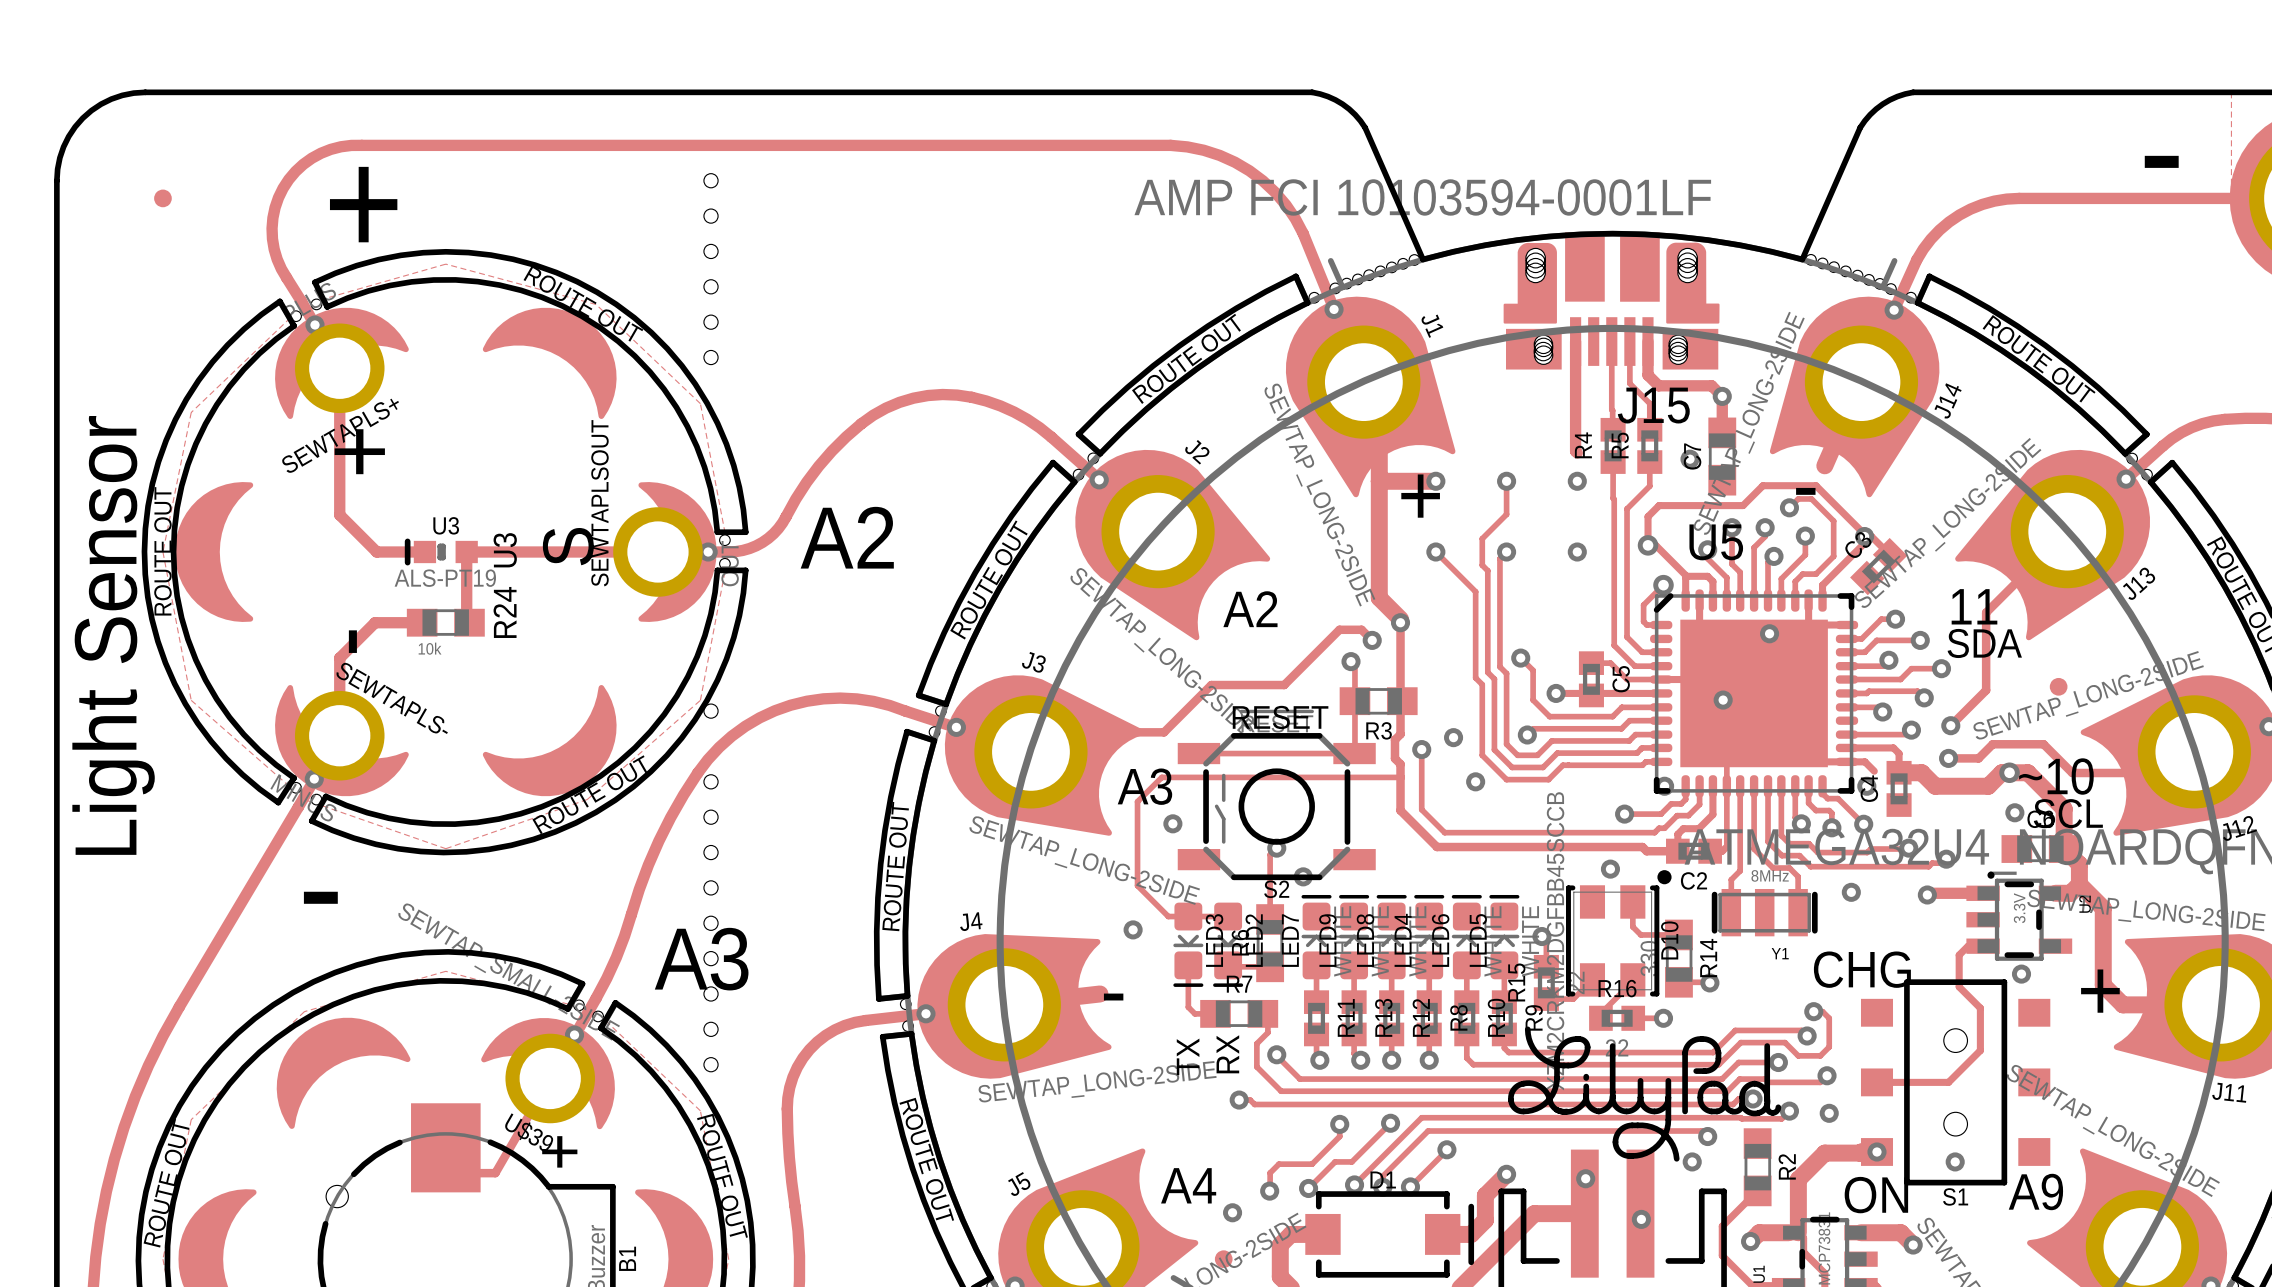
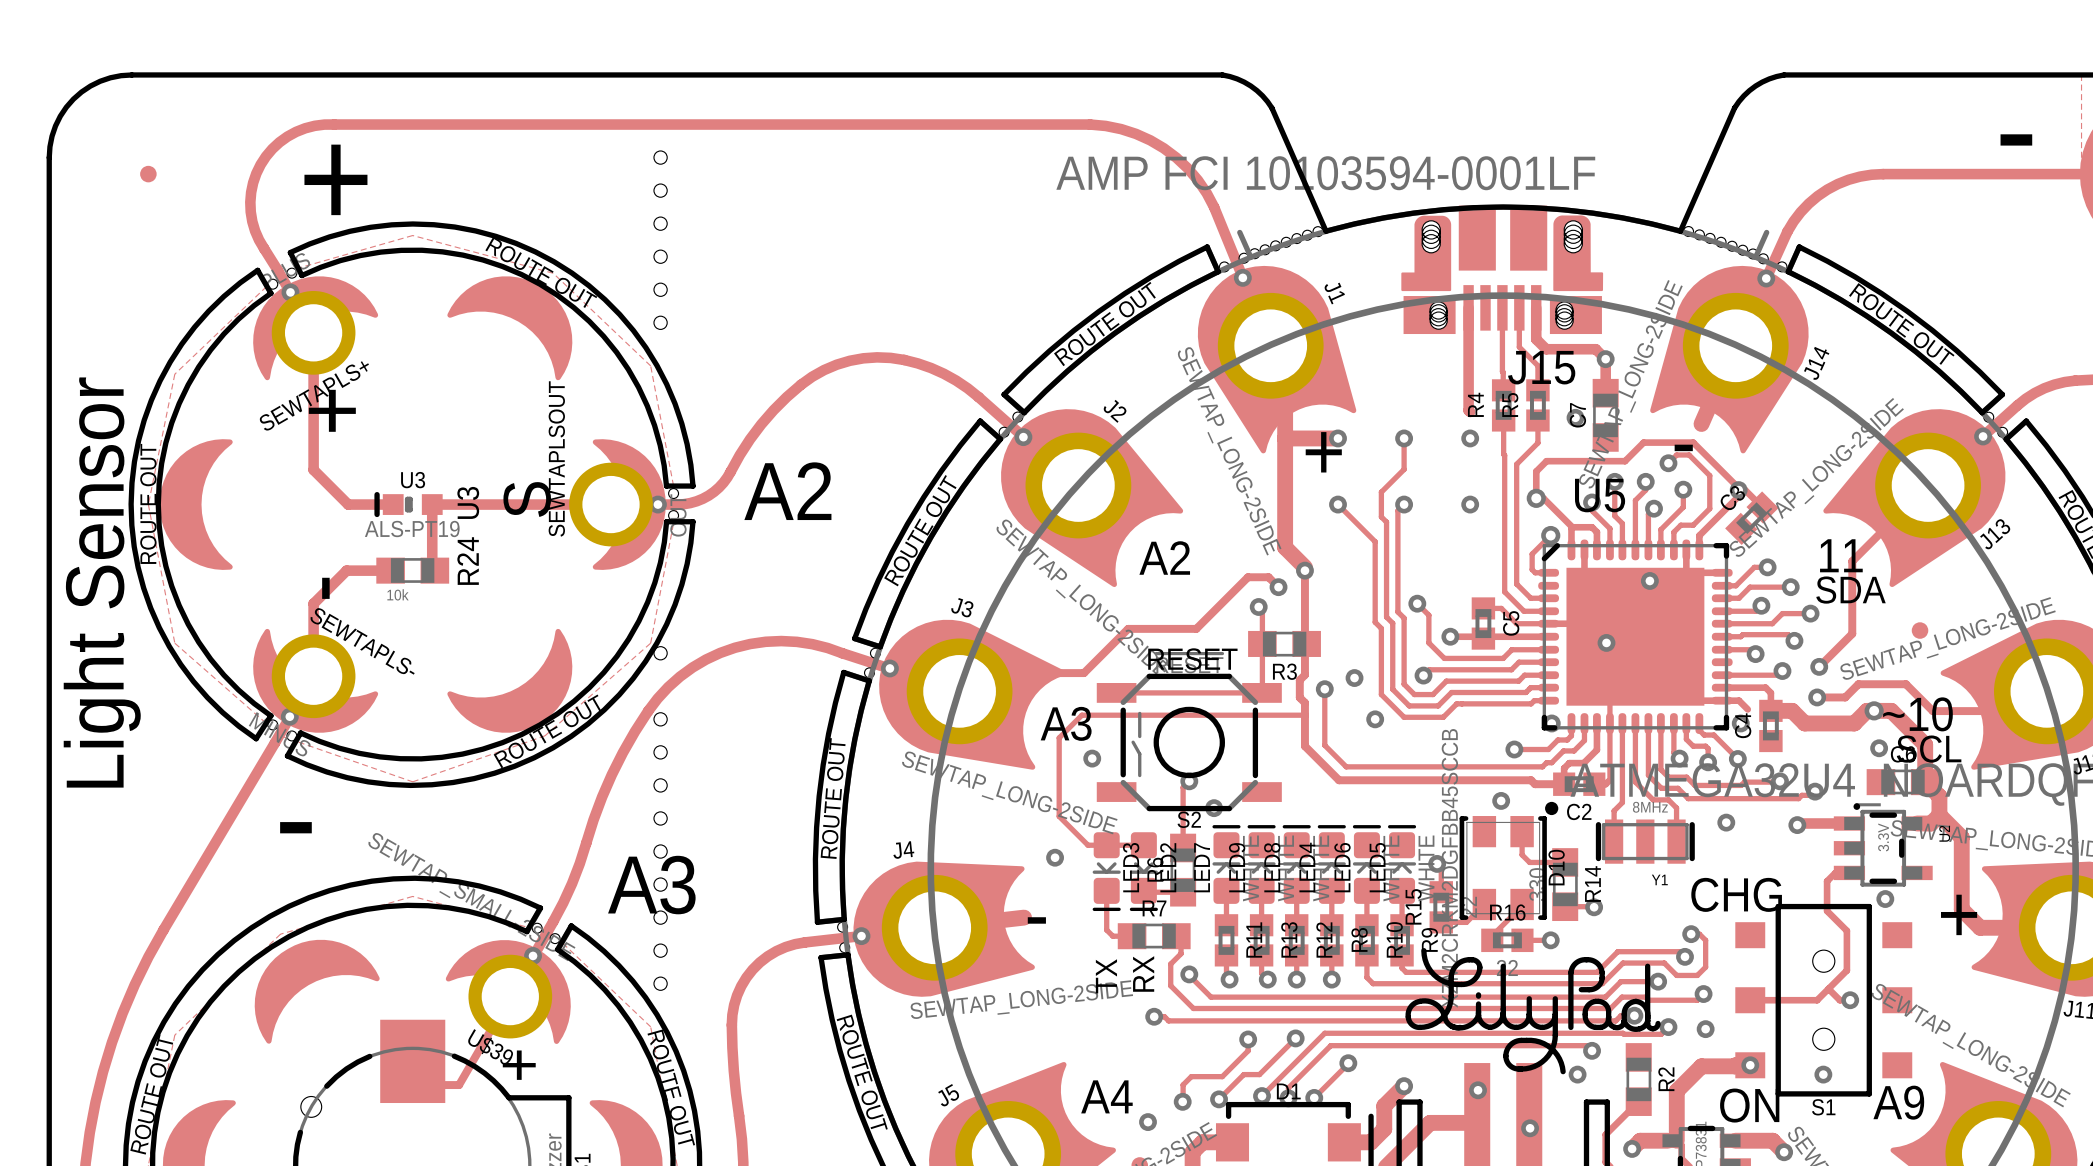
track: none -> (1828, 988) (1839, 1000) (1850, 1000)
via: none -> (1850, 1000)

